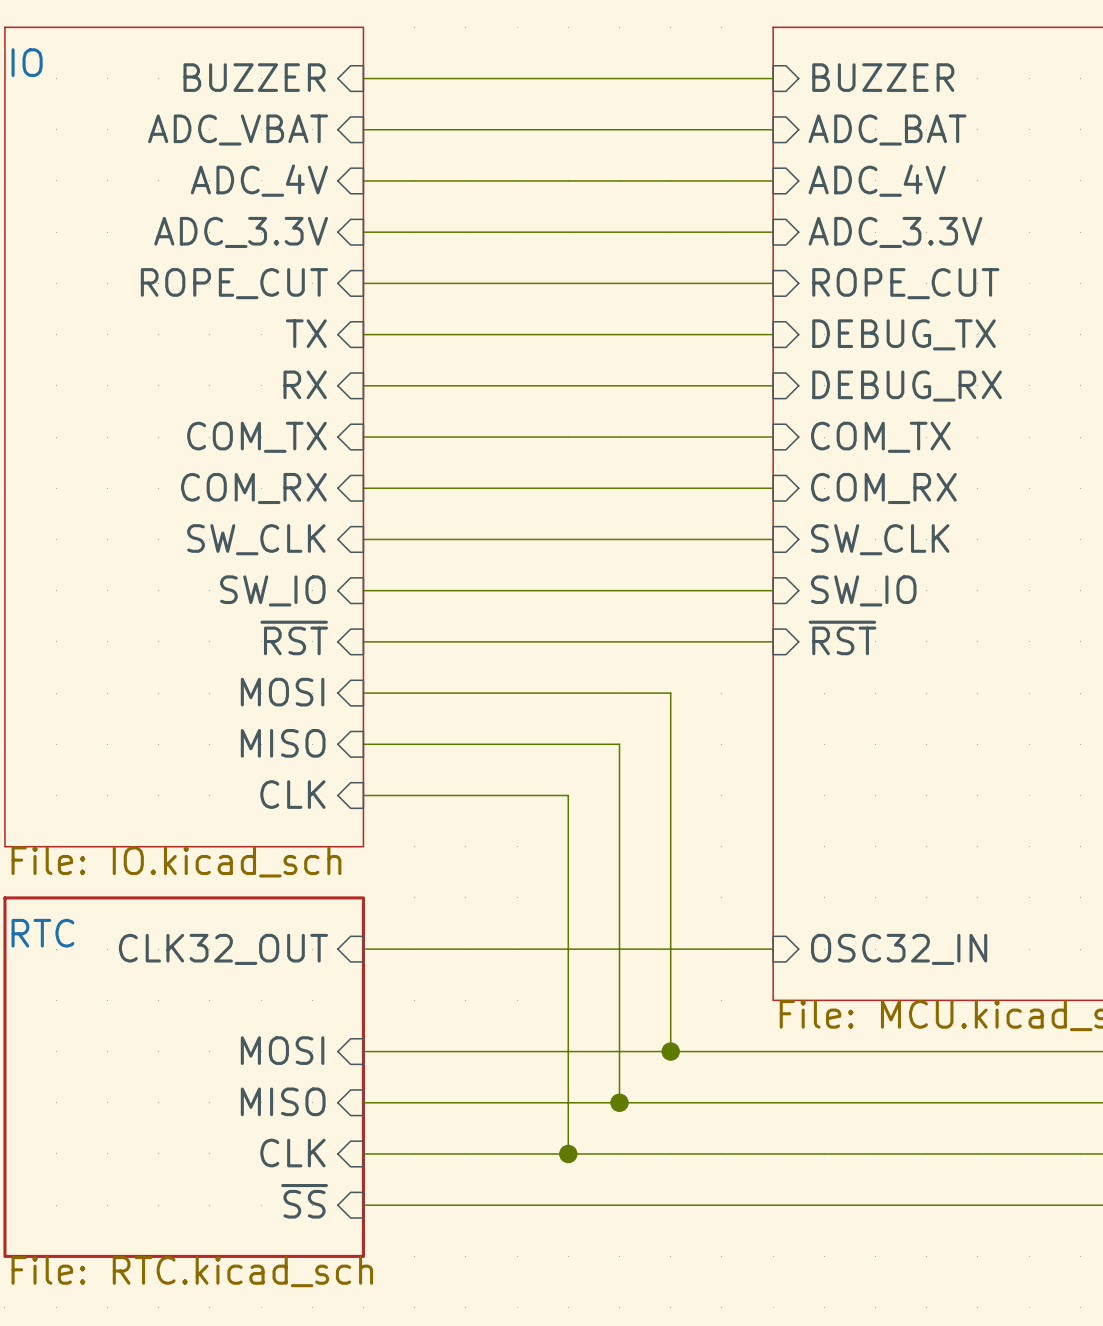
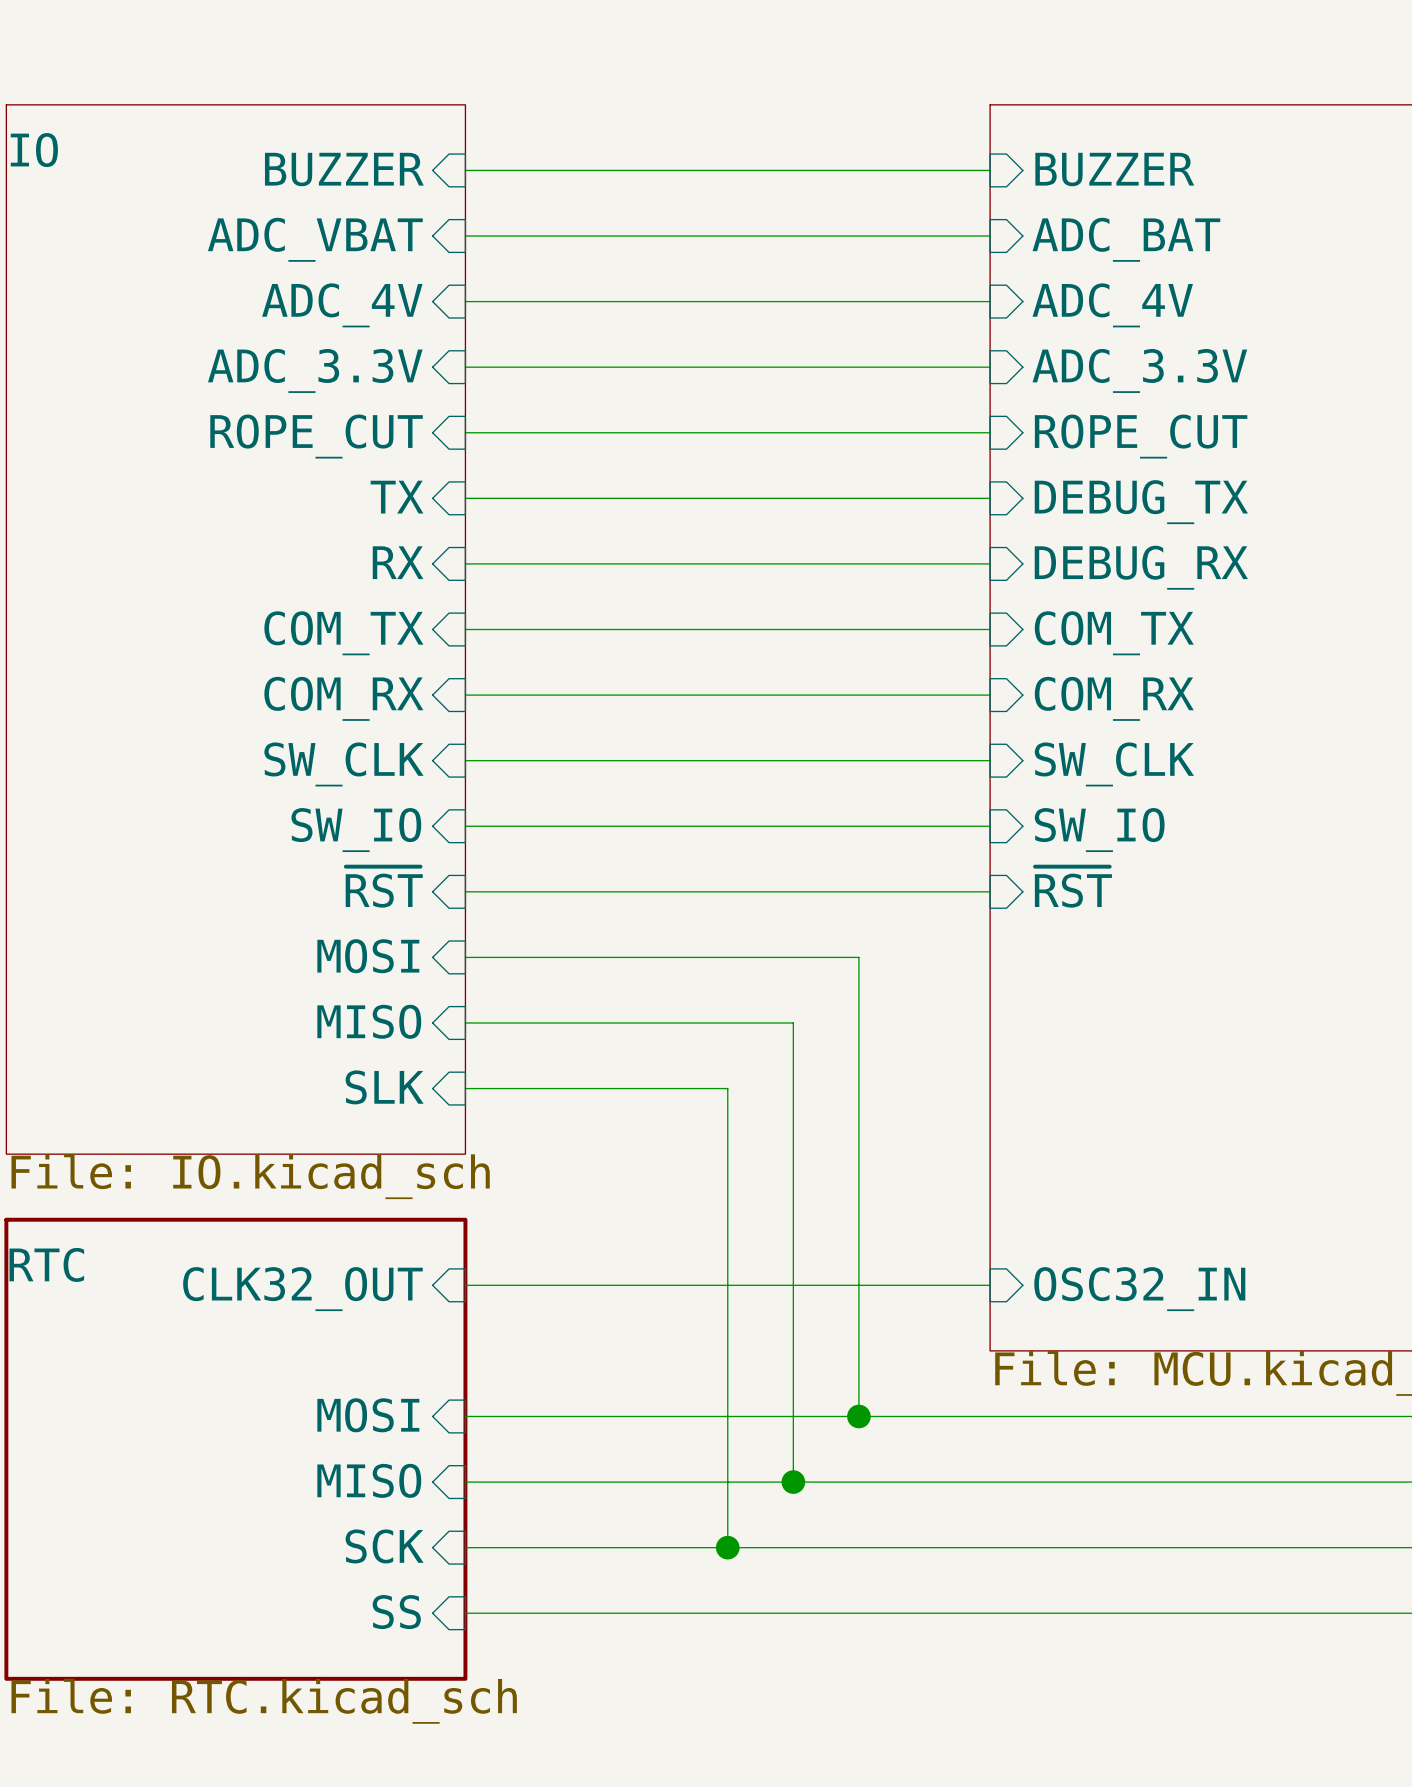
sheet pin: CLK (292, 794) -> SLK (384, 1087)
sheet pin: CLK (292, 1153) -> SCK (384, 1546)
sheet pin: ~{SS} (304, 1201) -> SS (396, 1612)

